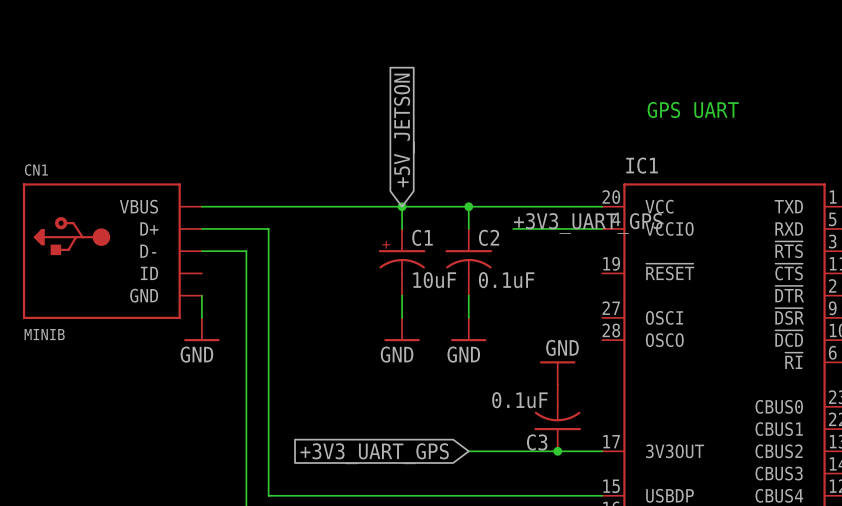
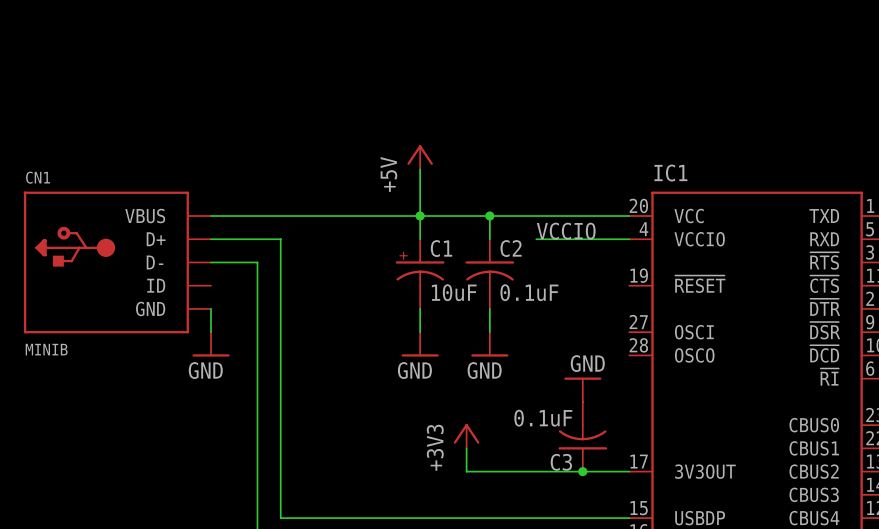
text: GPS UART (693, 109) -> none
global label: +5V_JETSON (404, 130) -> none
power symbol: none -> +5V (420, 157)
wire: none -> (420, 169) (420, 216)
label: +3V3_UART_GPS (588, 223) -> VCCIO (566, 231)
power symbol: none -> +3V3 (466, 436)
wire: none -> (466, 448) (466, 471) (489, 471)
global label: +3V3_UART_GPS (374, 453) -> none

